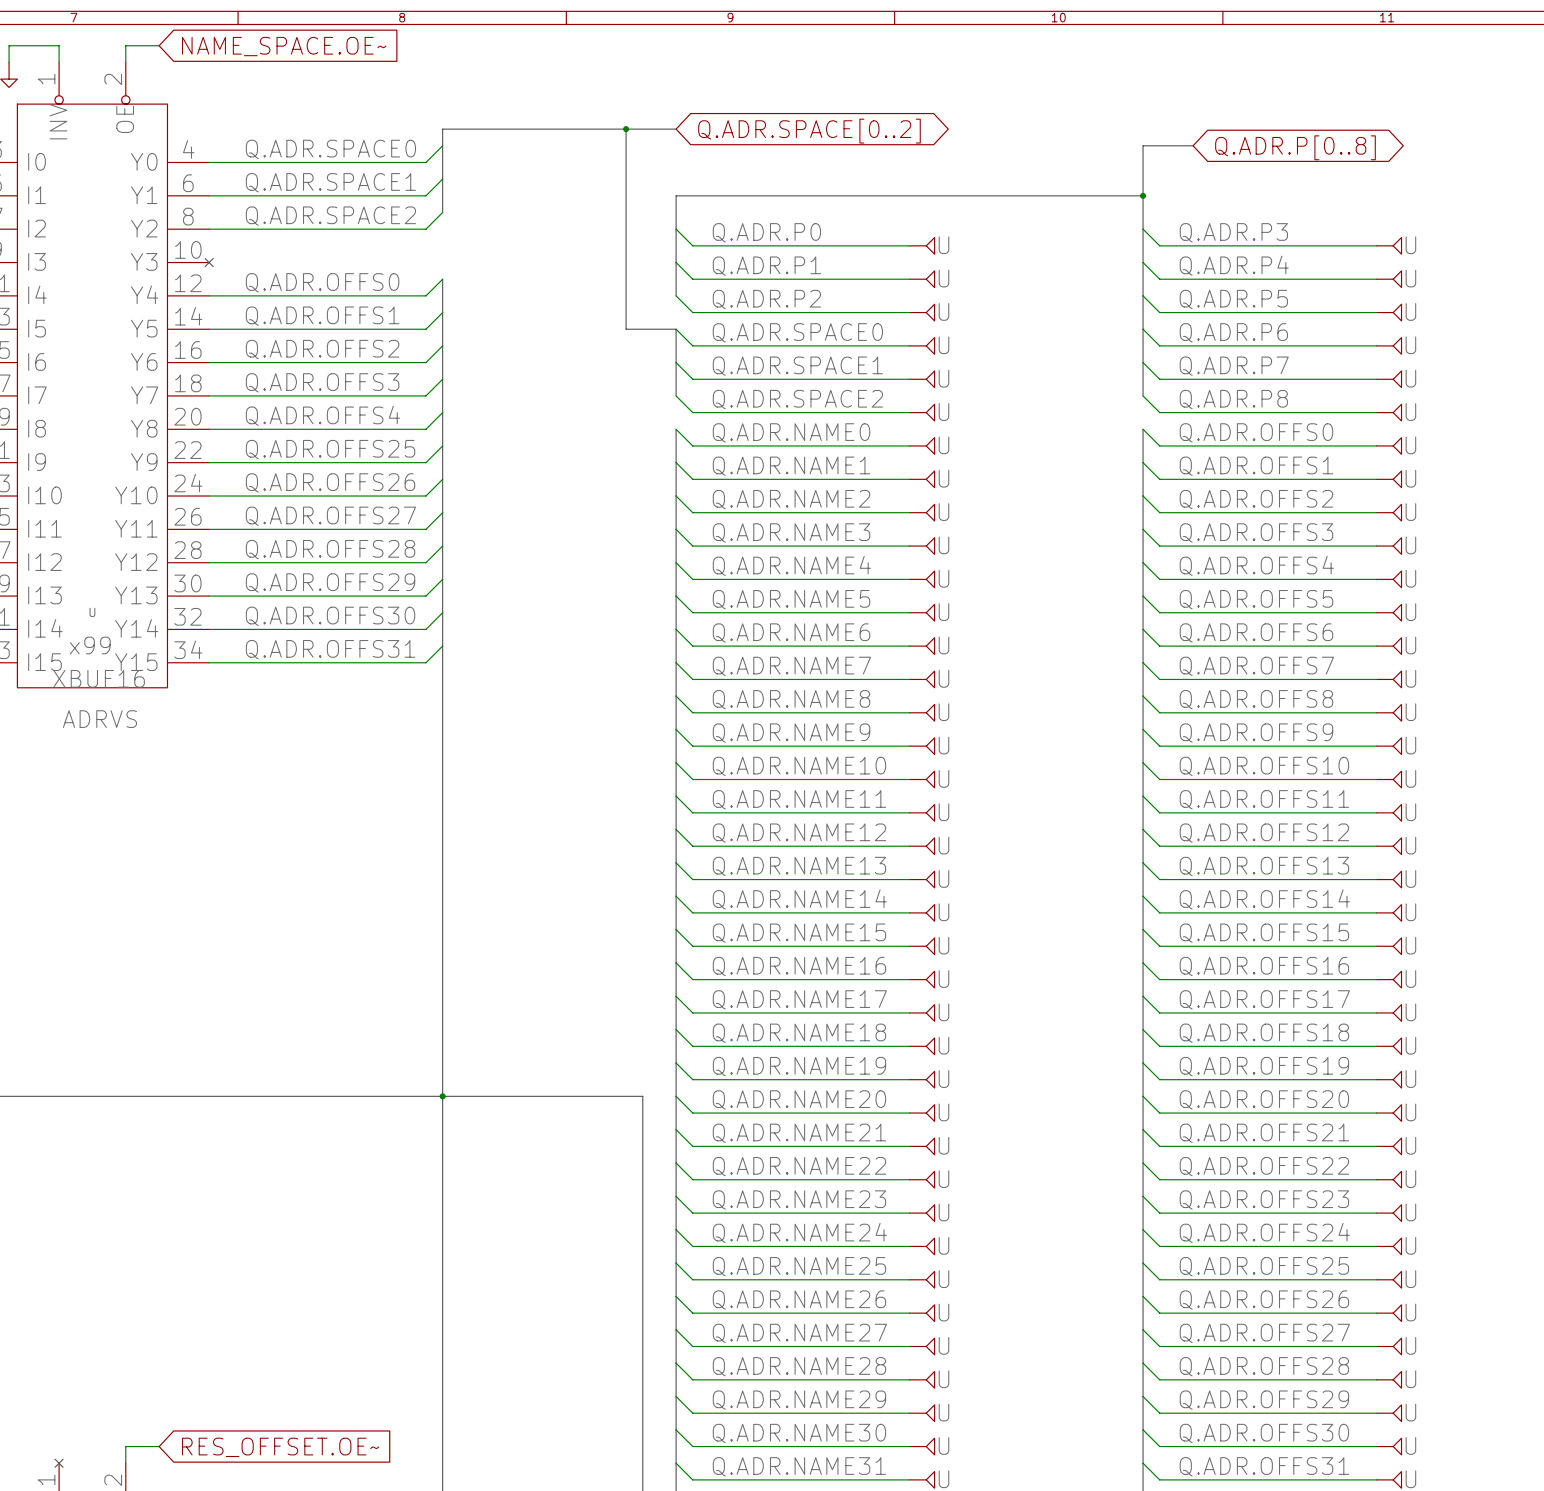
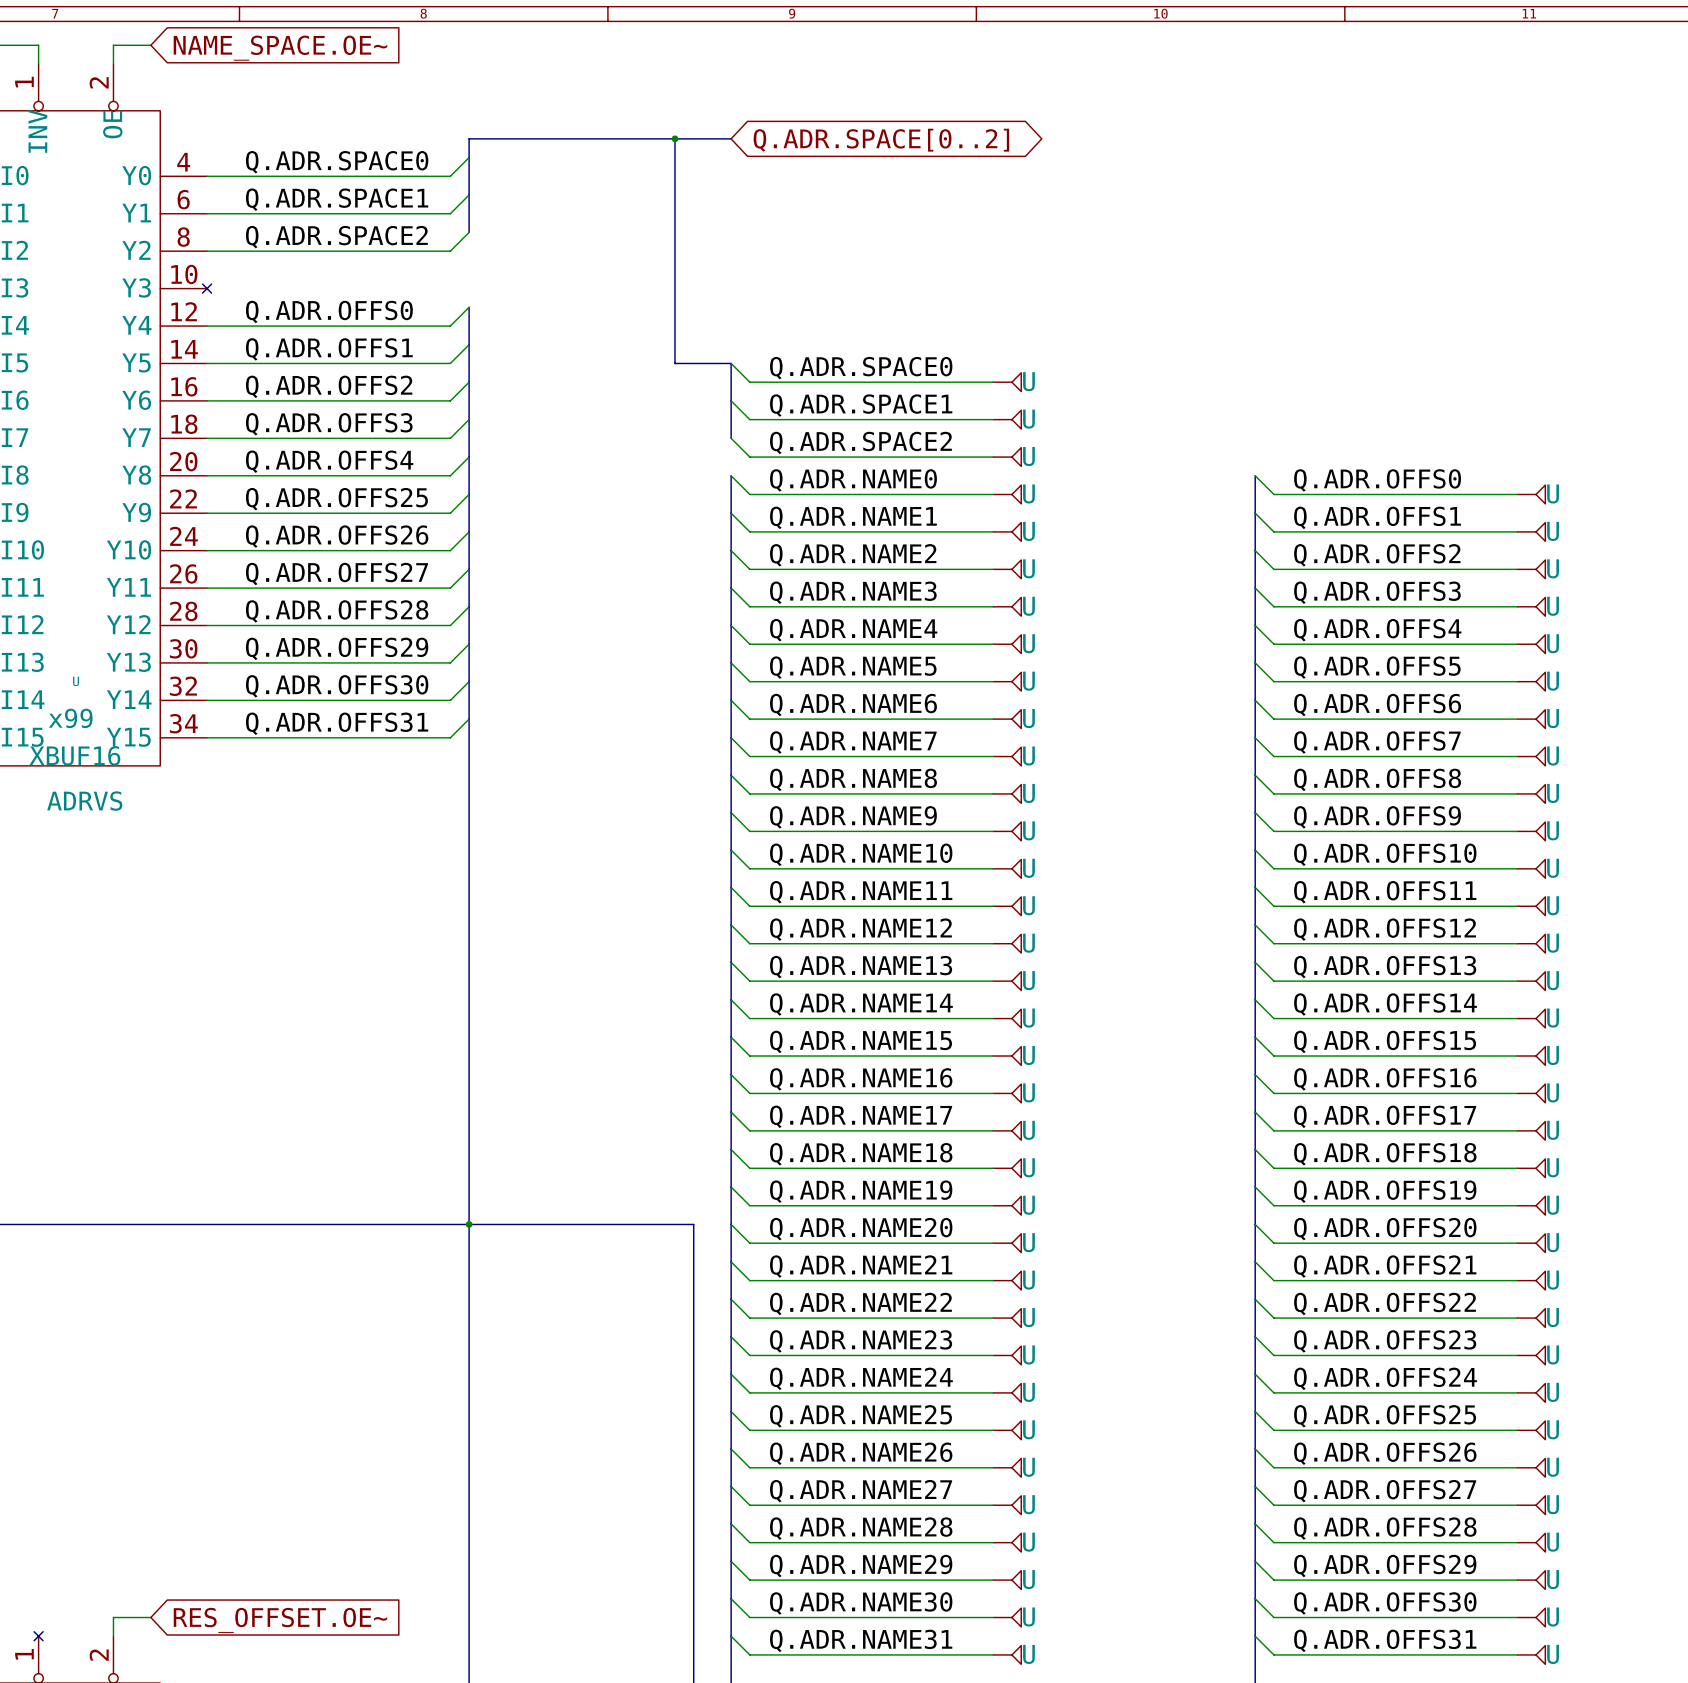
bus: (1193, 145) (1143, 145) (1143, 395) -> none
global label: Q.ADR.P[0..8] (1295, 147) -> none
bus: (1143, 195) (676, 195) (676, 295) -> none
junction: (1143, 195) -> none
wire: (676, 229) (692, 245) (909, 245) -> none
wire: (1143, 229) (1159, 245) (1376, 245) -> none
label: Q.ADR.P0 (766, 232) -> none
label: Q.ADR.P3 (1233, 232) -> none
U: (922, 245) -> none
U: (1389, 245) -> none
wire: (676, 262) (692, 279) (909, 279) -> none
wire: (1143, 262) (1159, 279) (1376, 279) -> none
label: Q.ADR.P4 (1234, 265) -> none
label: Q.ADR.P1 (766, 266) -> none
U: (922, 279) -> none
U: (1389, 279) -> none
wire: (676, 295) (692, 312) (909, 312) -> none
wire: (1143, 295) (1159, 312) (1376, 312) -> none
label: Q.ADR.P2 (766, 299) -> none
label: Q.ADR.P5 (1233, 299) -> none
U: (922, 312) -> none
U: (1389, 312) -> none
wire: (1143, 329) (1159, 345) (1376, 345) -> none
label: Q.ADR.P6 (1233, 332) -> none
U: (1389, 345) -> none
wire: (1143, 362) (1159, 379) (1376, 379) -> none
label: Q.ADR.P7 (1234, 366) -> none
U: (1389, 379) -> none
wire: (1143, 395) (1159, 412) (1376, 412) -> none
label: Q.ADR.P8 (1233, 399) -> none
U: (1389, 412) -> none

